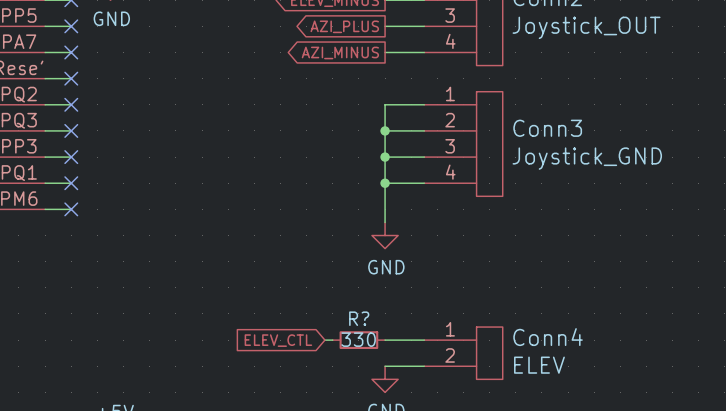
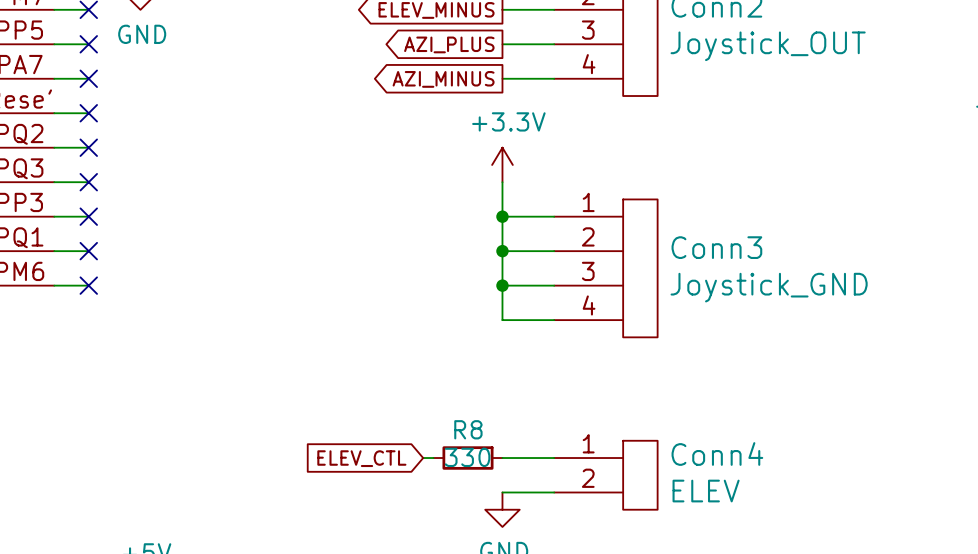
wire: (424, 104) (385, 104) (385, 130) (424, 130) -> none
power symbol: none -> +3.3V (502, 164)
junction: (385, 130) -> none
Conn3 position: (463, 144) -> (605, 268)
wire: none -> (502, 285) (554, 285)
junction: none -> (502, 285)
wire: none -> (502, 302) (502, 320) (554, 320)
power symbol: GND (385, 235) -> none
R? name: R? (359, 318) -> R8 (468, 429)

